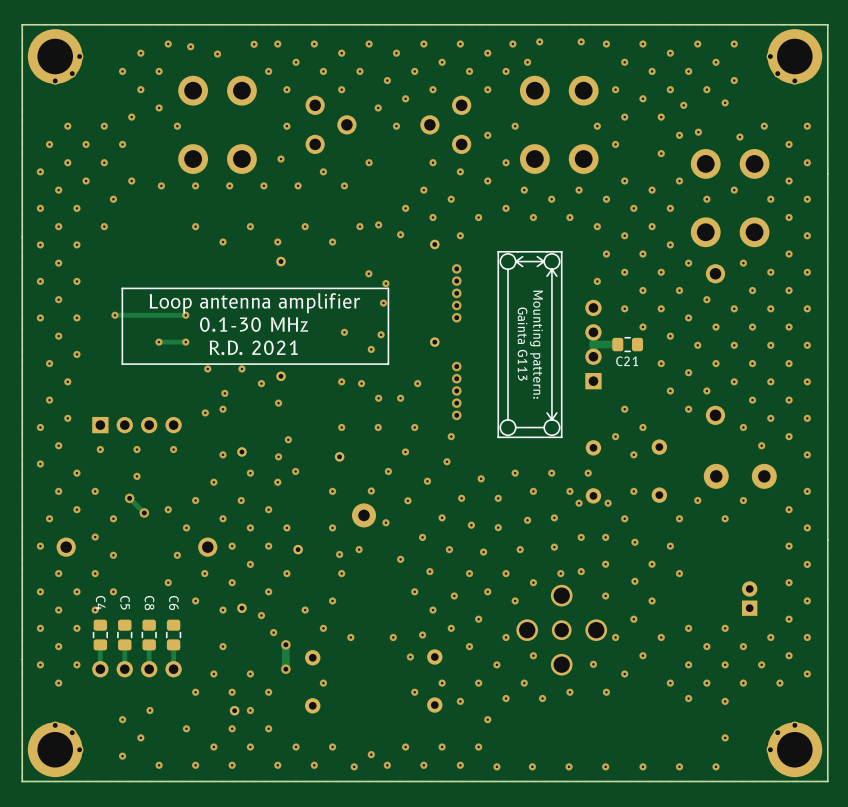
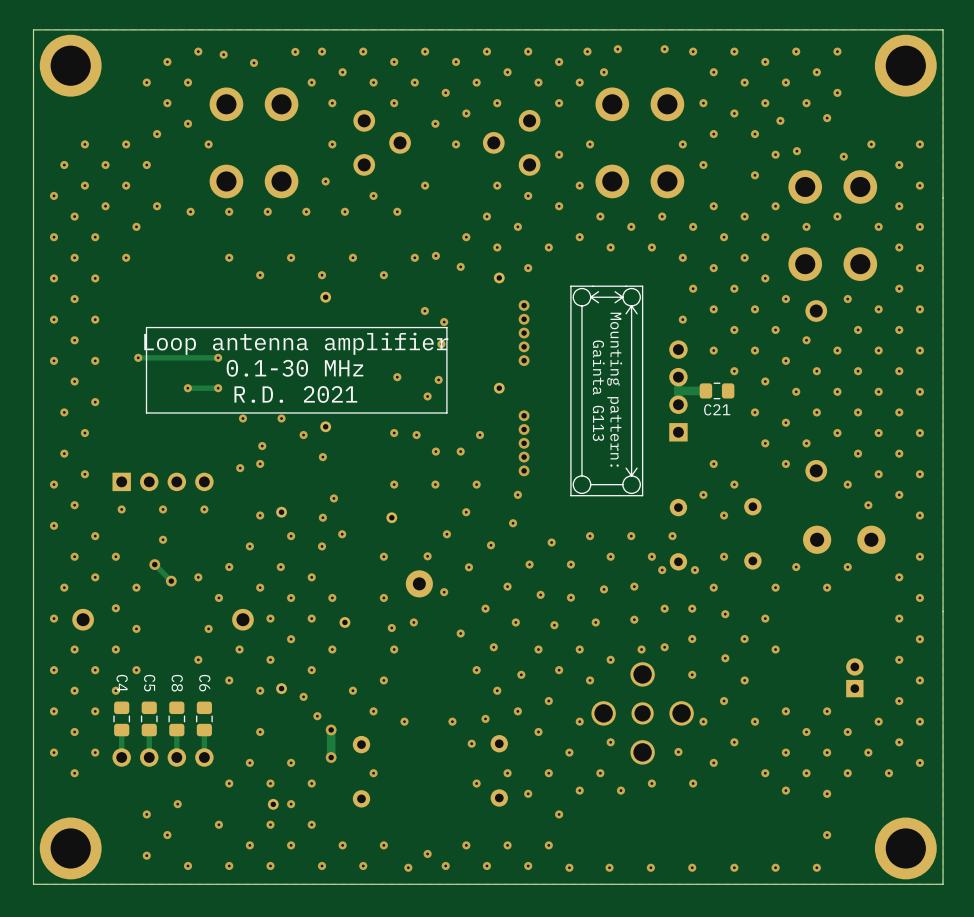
part footprint: [27, 29, 84, 85] -> [39, 34, 102, 97]
part footprint: [766, 29, 823, 85] -> [874, 34, 937, 97]
part footprint: [27, 721, 84, 778] -> [39, 817, 102, 880]
part footprint: [766, 721, 823, 778] -> [874, 817, 937, 880]

